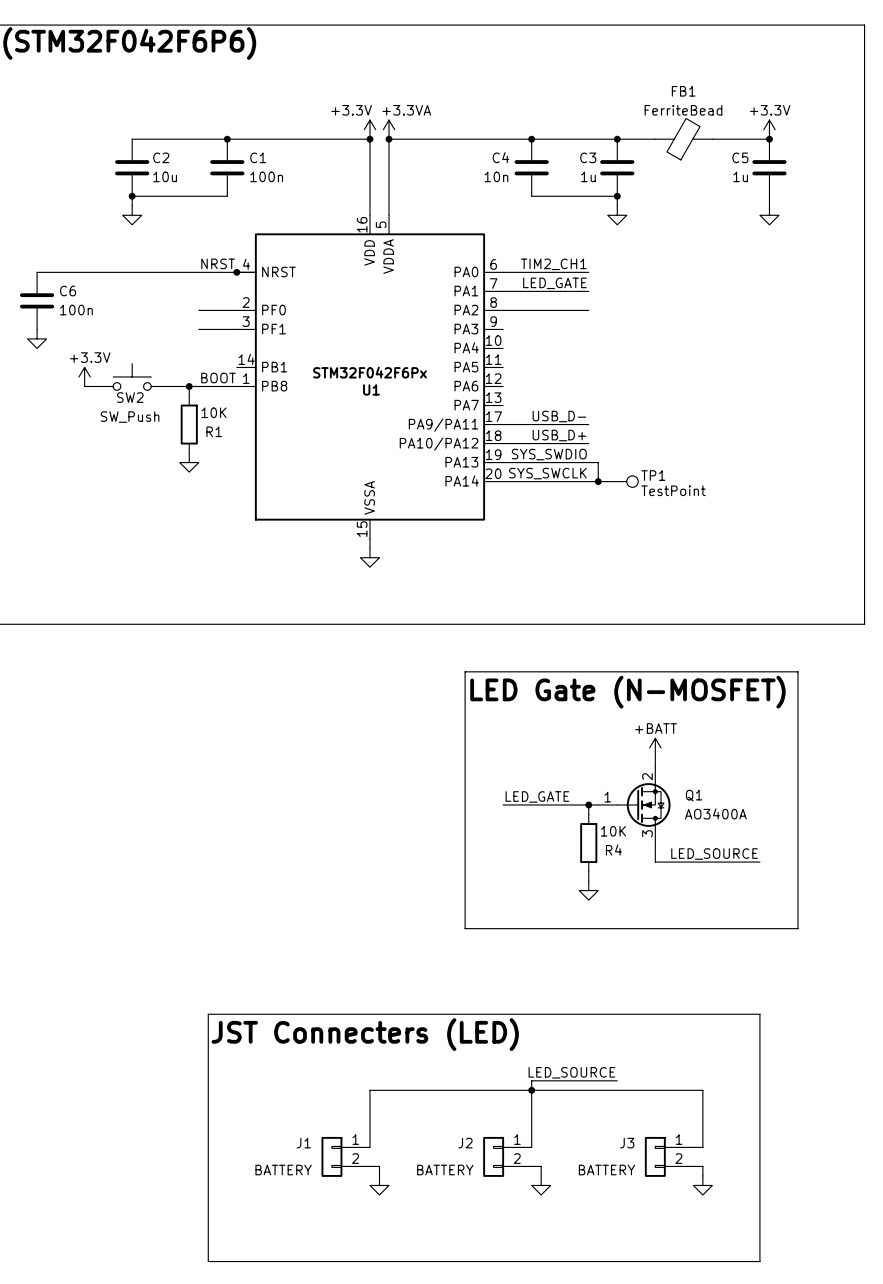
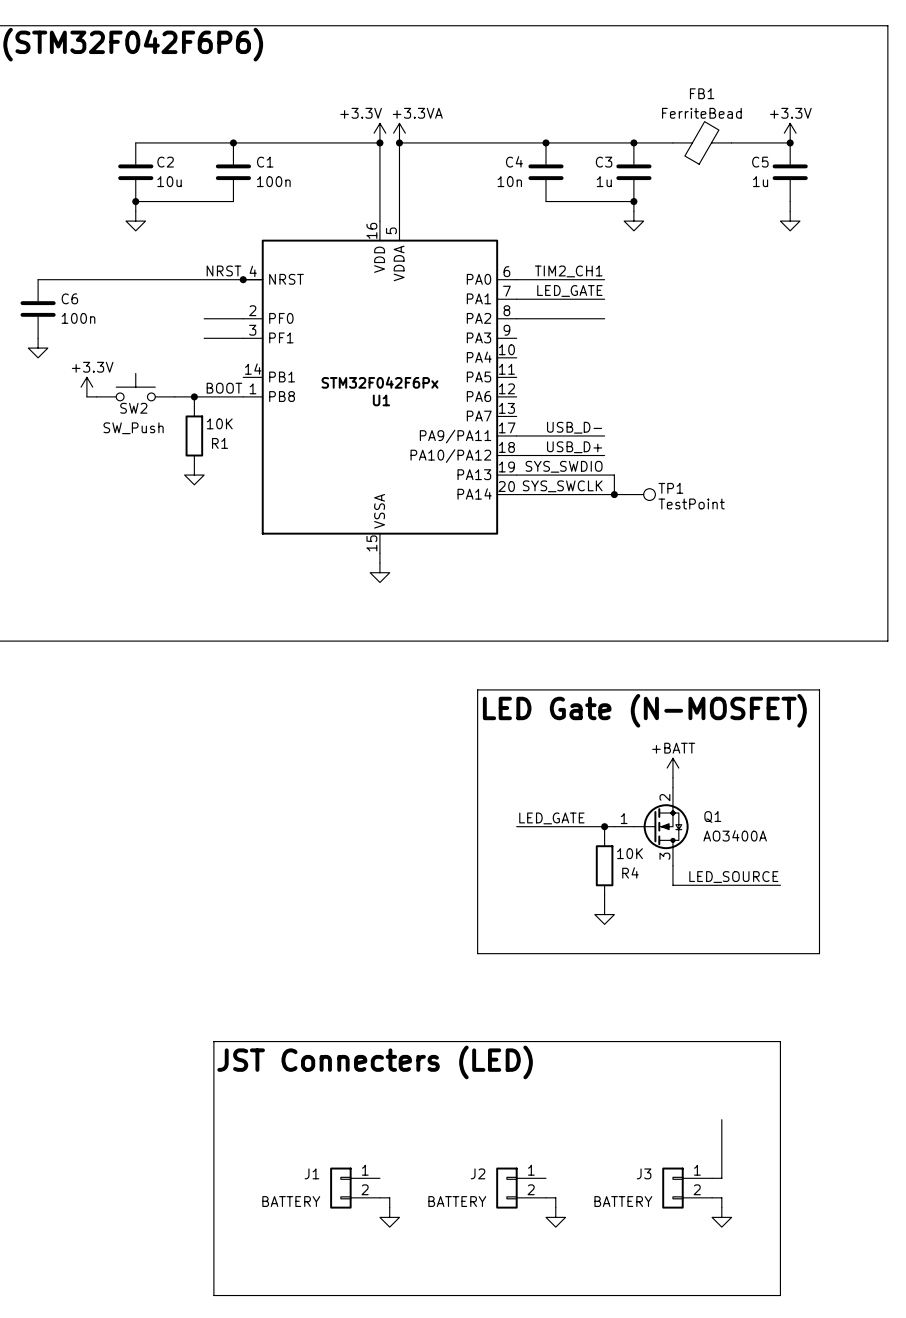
label: LED_SOURCE (571, 1072) -> none
wire: (617, 1080) (531, 1080) (531, 1147) -> none
junction: (531, 1090) -> none
wire: (702, 1090) (369, 1090) (369, 1147) -> none

